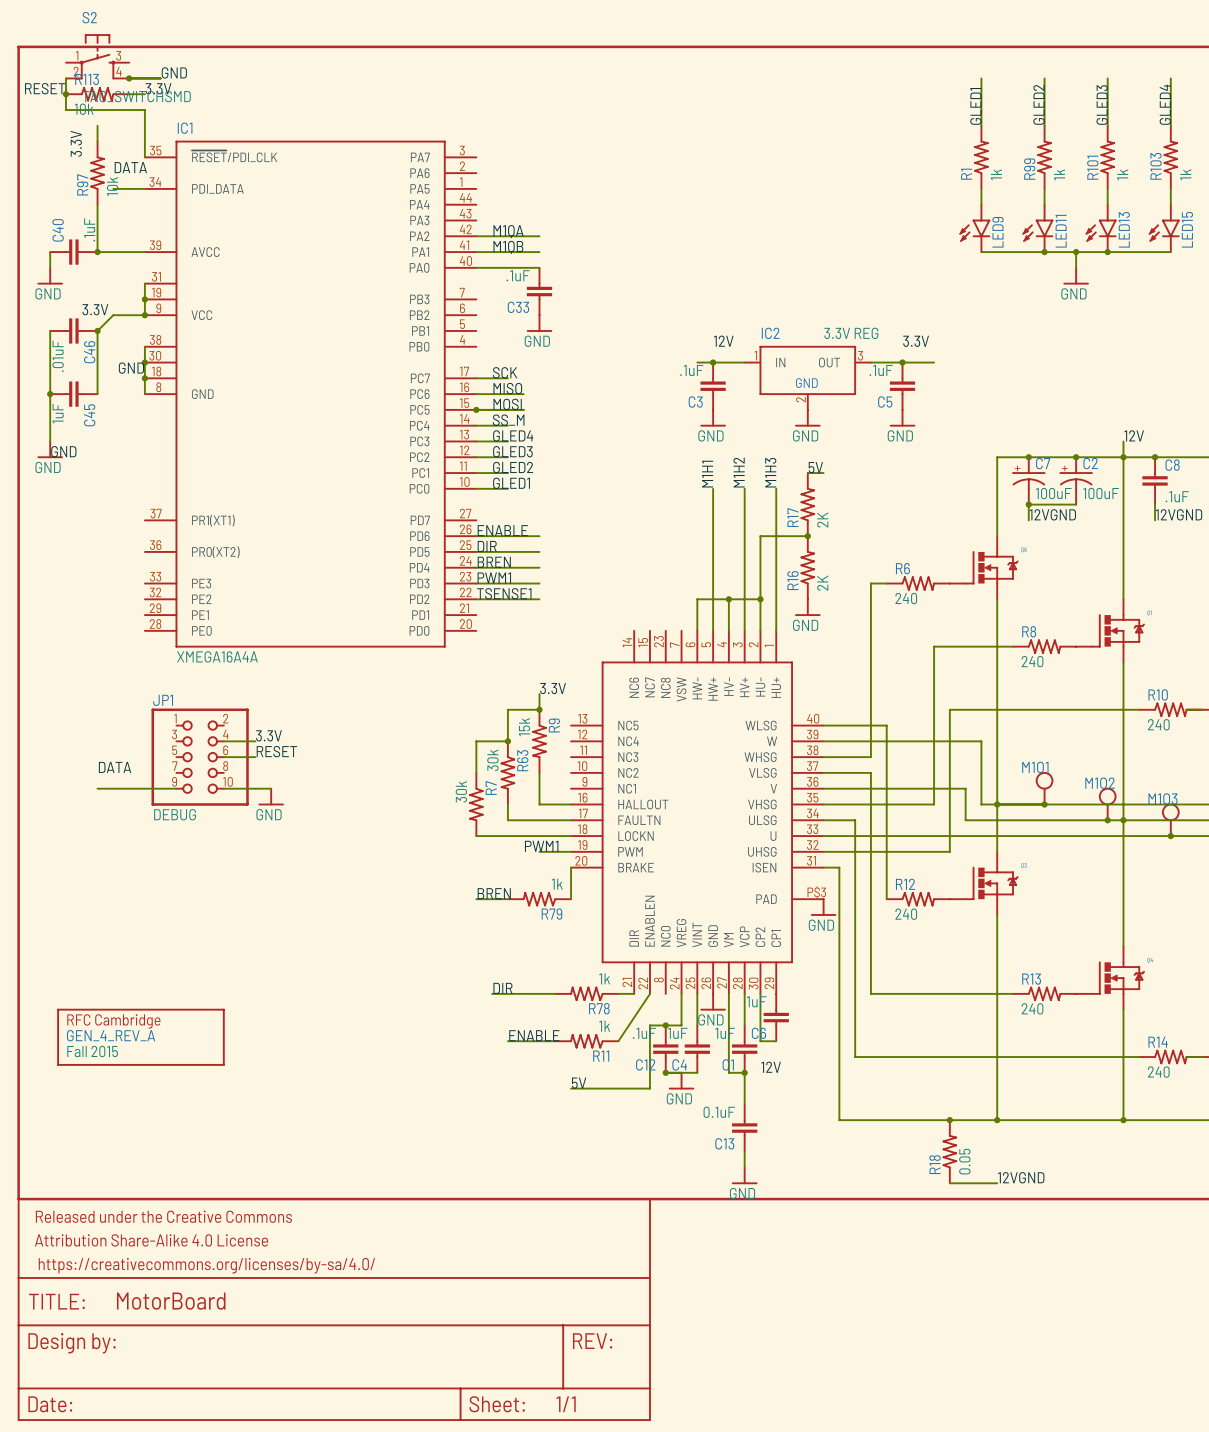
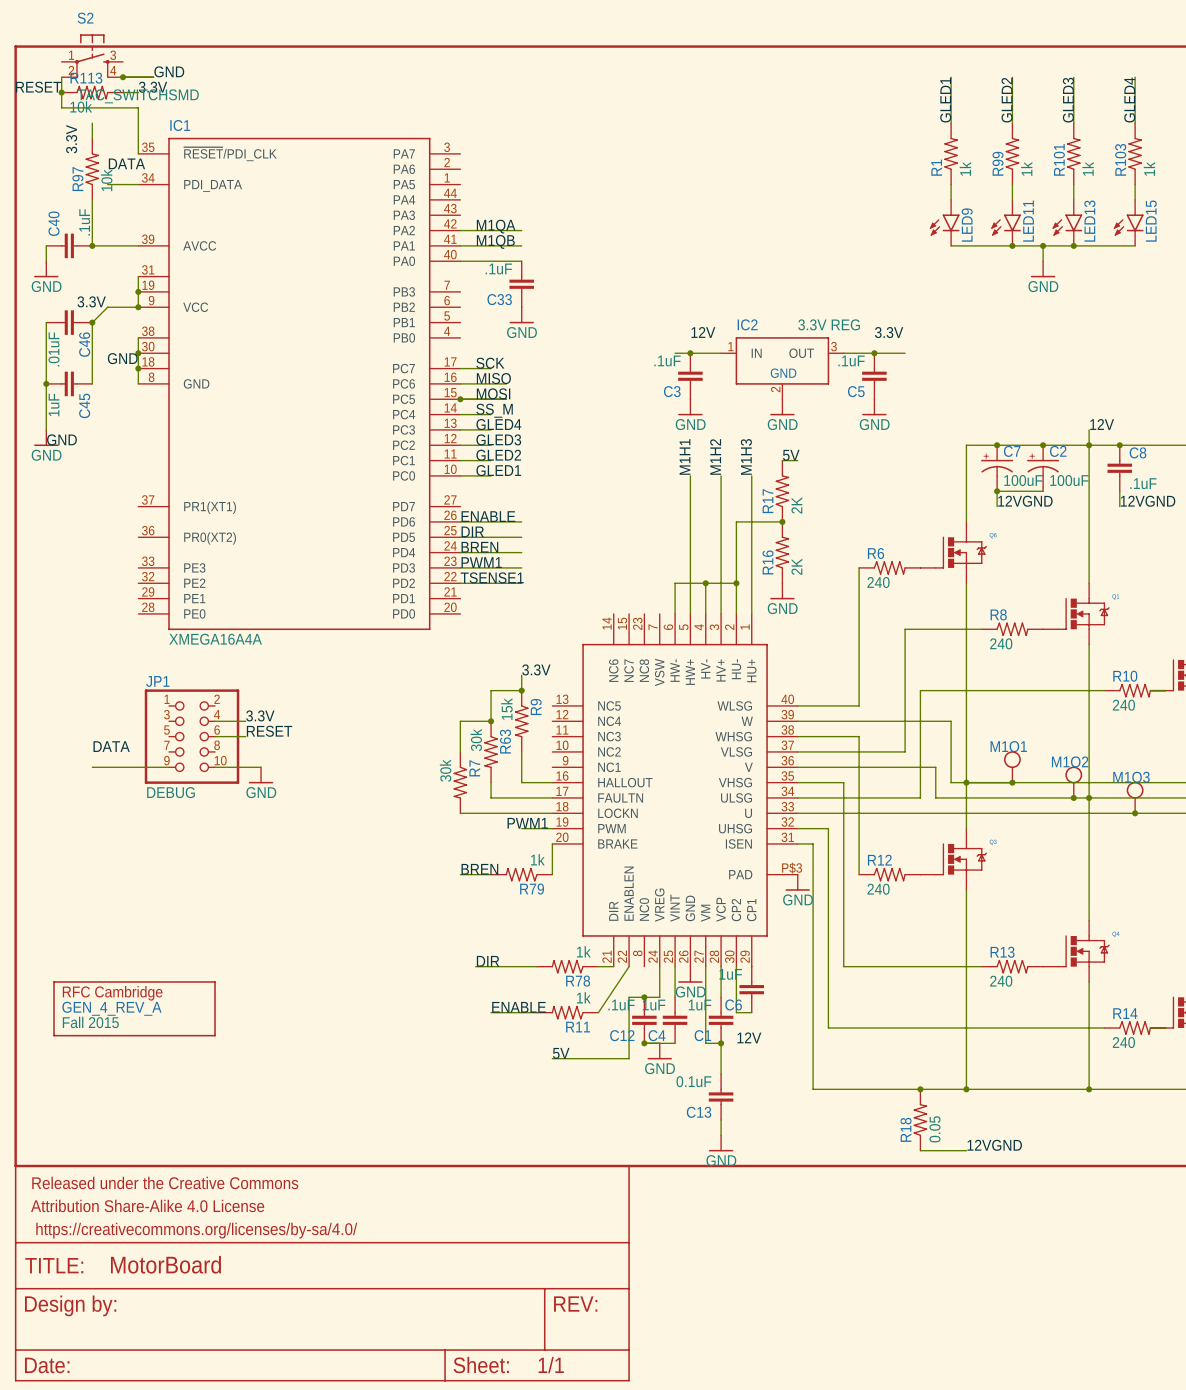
wire: (886, 583) (870, 583) (870, 757) -> (859, 567) (859, 705)
wire: (886, 725) (886, 757) -> (843, 736) (859, 736)
wire: (870, 772) (870, 804) (934, 804) (934, 772) -> (843, 751) (905, 751)
wire: (855, 820) (855, 851) (949, 851) (949, 820) -> (828, 797) (920, 797)

